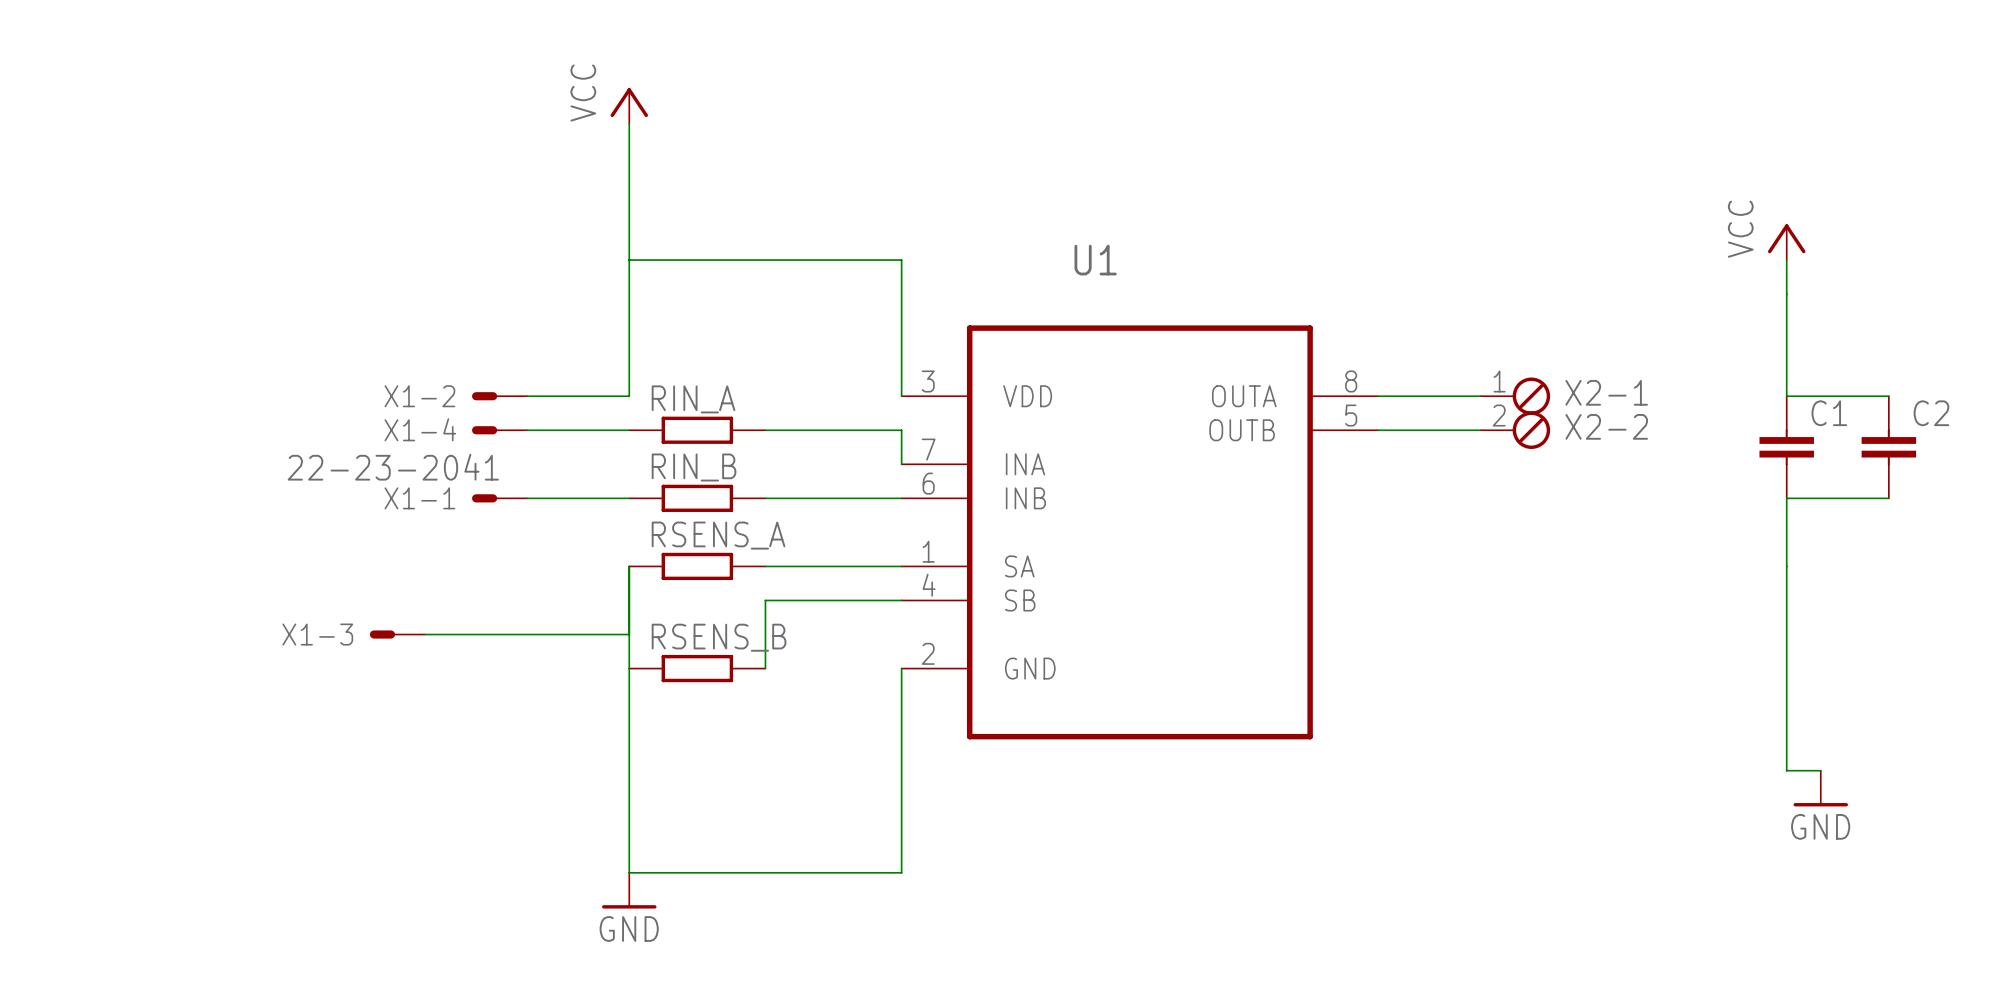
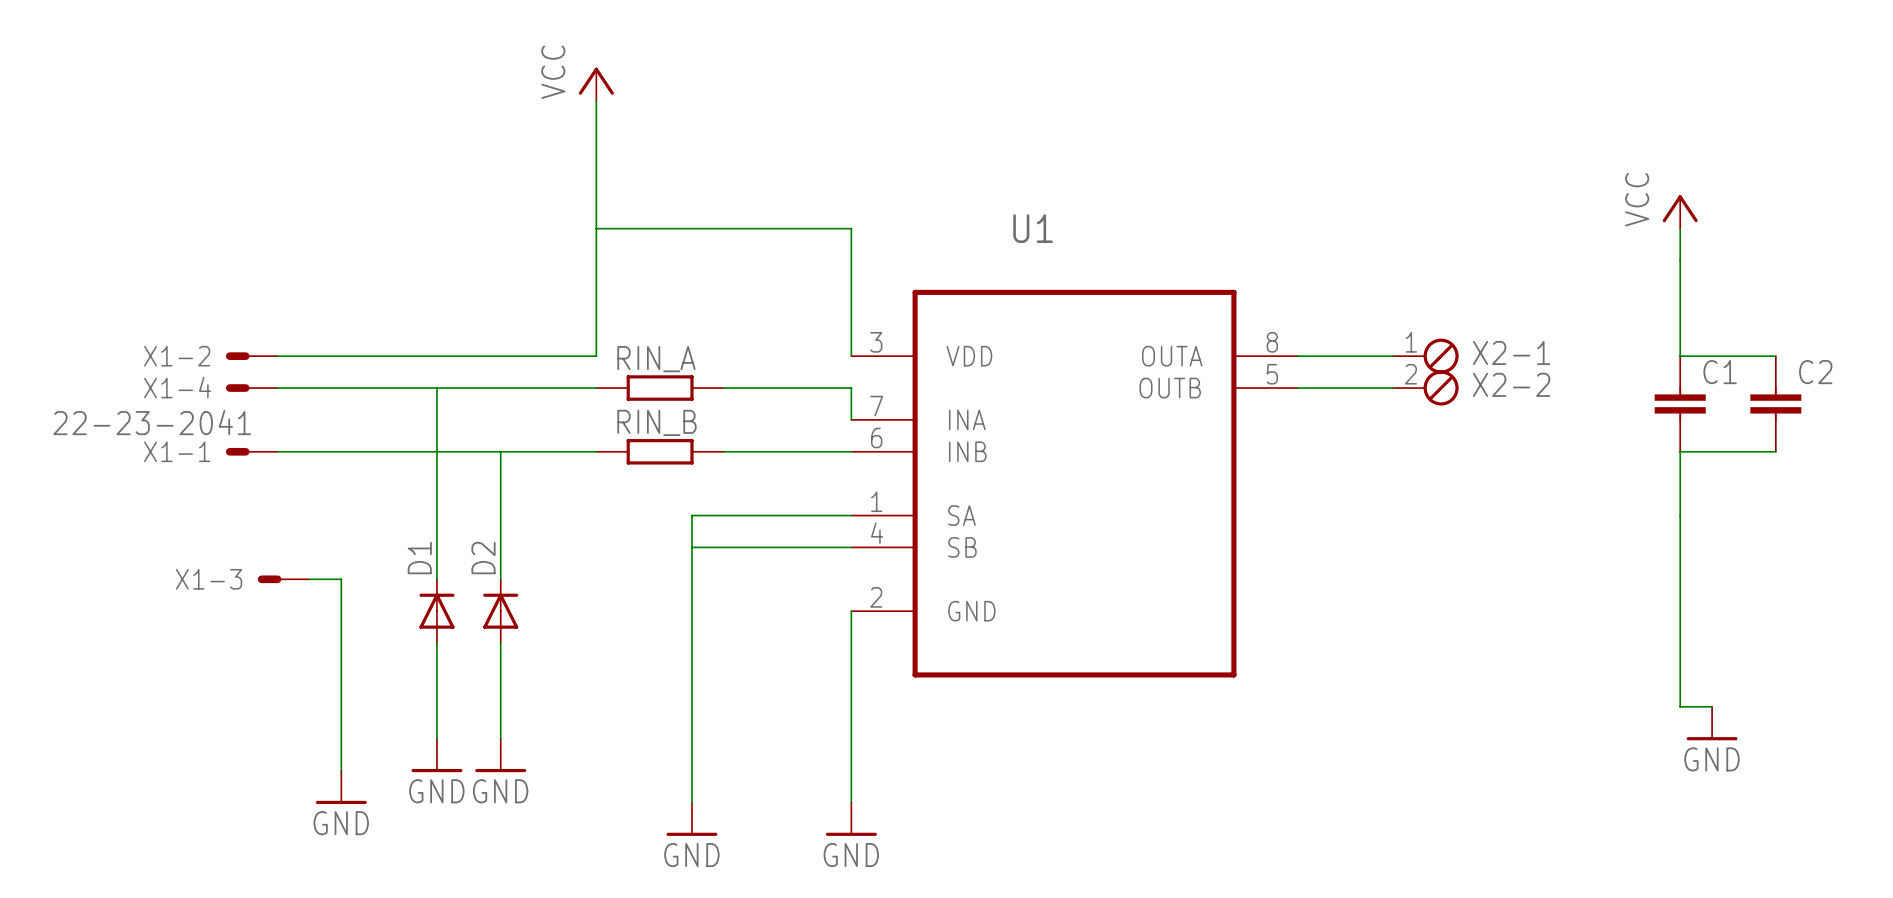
wire: none -> (277, 356) (500, 356)
X1-2 position: (499, 396) -> (251, 356)
wire: none -> (277, 388) (500, 388)
wire: none -> (436, 388) (436, 579)
X1-4 position: (499, 430) -> (251, 388)
wire: none -> (277, 451) (500, 451) (500, 579)
X1-1 position: (499, 498) -> (251, 451)
wire: (629, 566) (629, 872) (901, 872) -> none
RSENS_A: (697, 566) -> none
wire: none -> (723, 515) (691, 515) (691, 802)
wire: (765, 600) (765, 668) -> (723, 547) (691, 547)
wire: none -> (309, 579) (341, 579) (341, 770)
X1-3 position: (397, 634) -> (283, 579)
wire: (425, 634) (629, 634) -> none
D1: none -> (436, 611)
D2: none -> (500, 611)
RSENS_B: (697, 668) -> none
wire: none -> (436, 643) (436, 738)
wire: none -> (500, 643) (500, 738)
power symbol: none -> GND (436, 755)
power symbol: none -> GND (500, 755)
power symbol: none -> GND (341, 787)
power symbol: GND (629, 890) -> none
power symbol: none -> GND (691, 819)
power symbol: none -> GND (851, 819)

